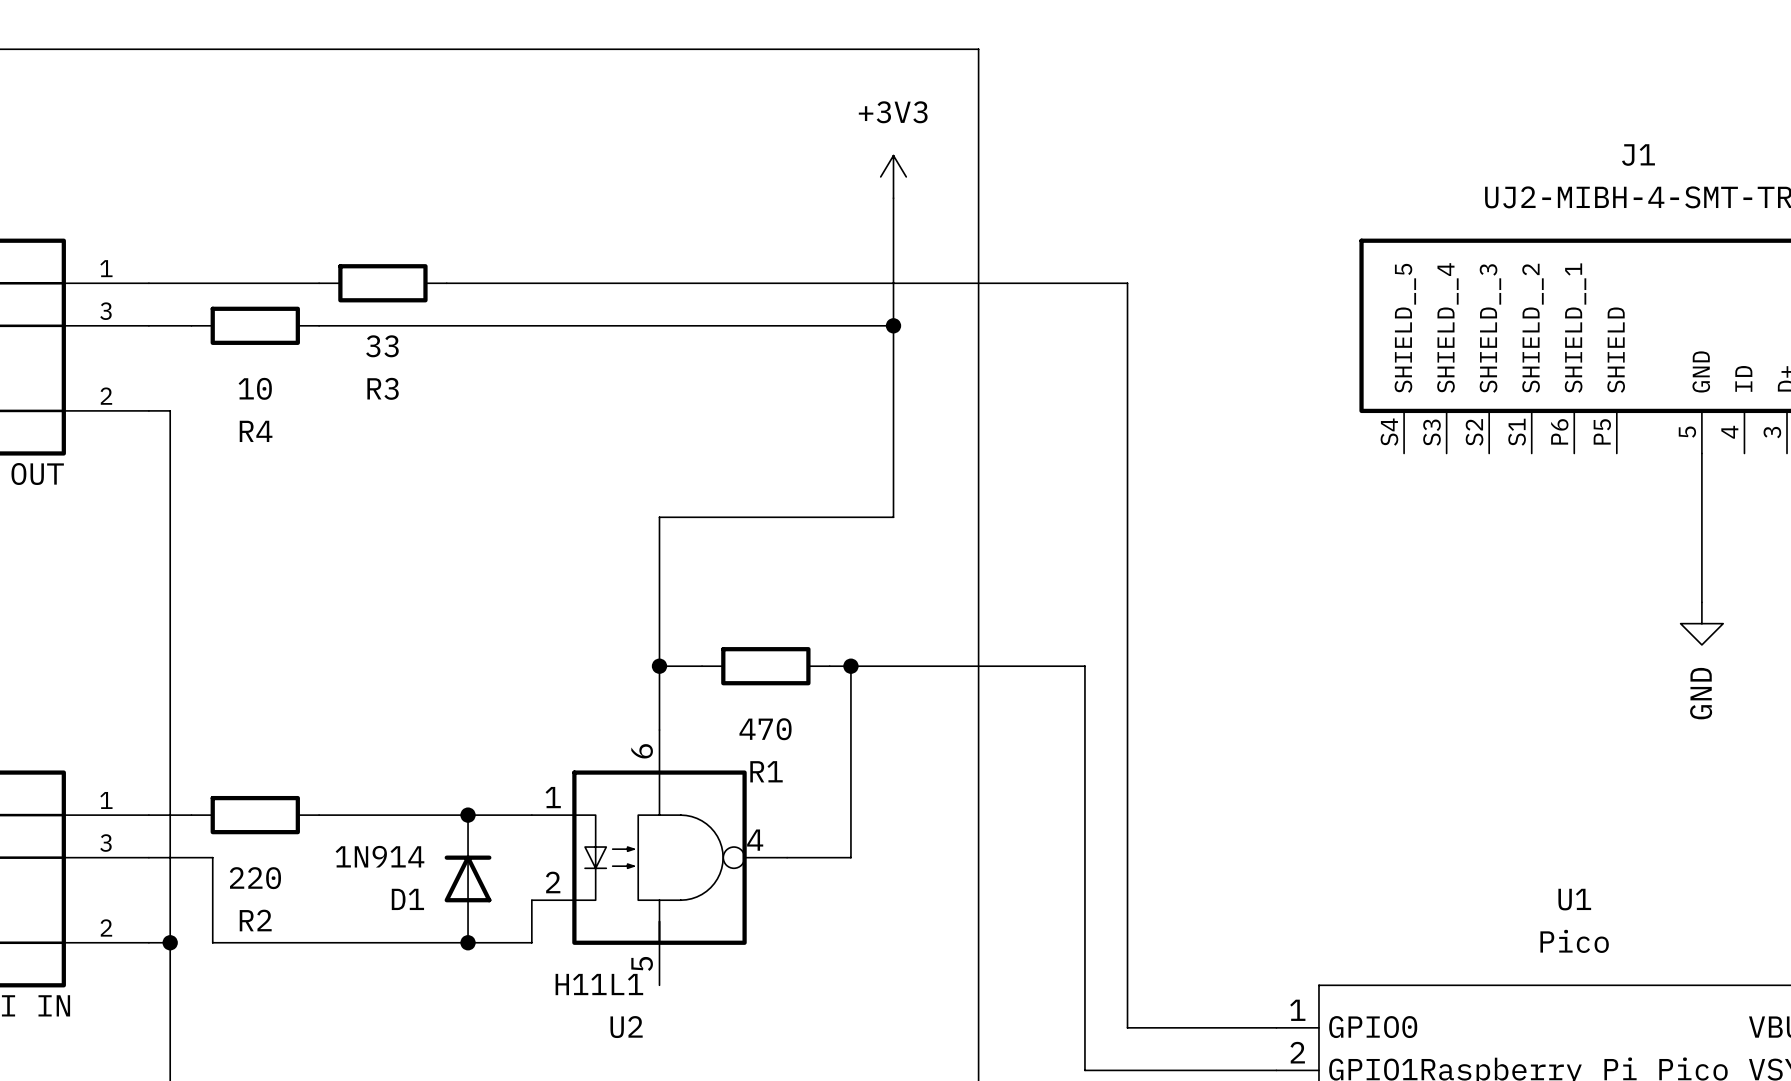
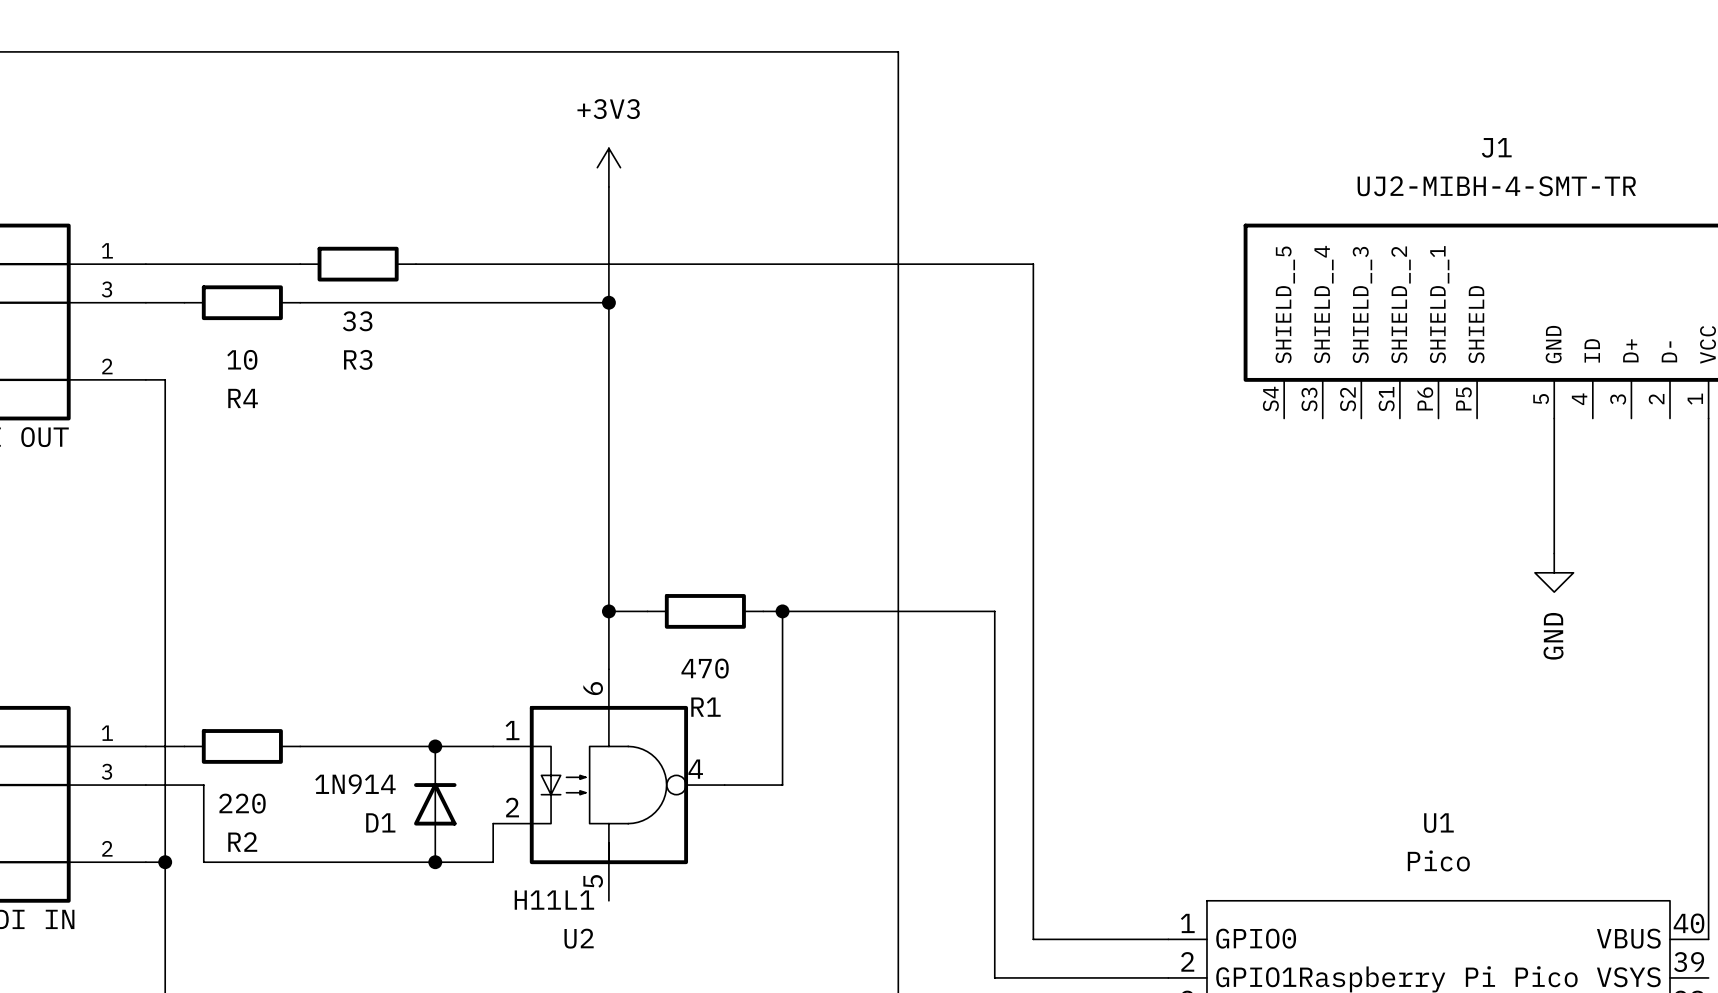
power symbol position: +3V3 (893, 176) -> +3V3 (608, 167)
wire: (893, 198) (893, 517) (659, 517) -> (608, 186) (608, 476)
wire: (659, 325) (893, 325) -> none
junction: none -> (608, 302)
junction: (893, 325) -> none

